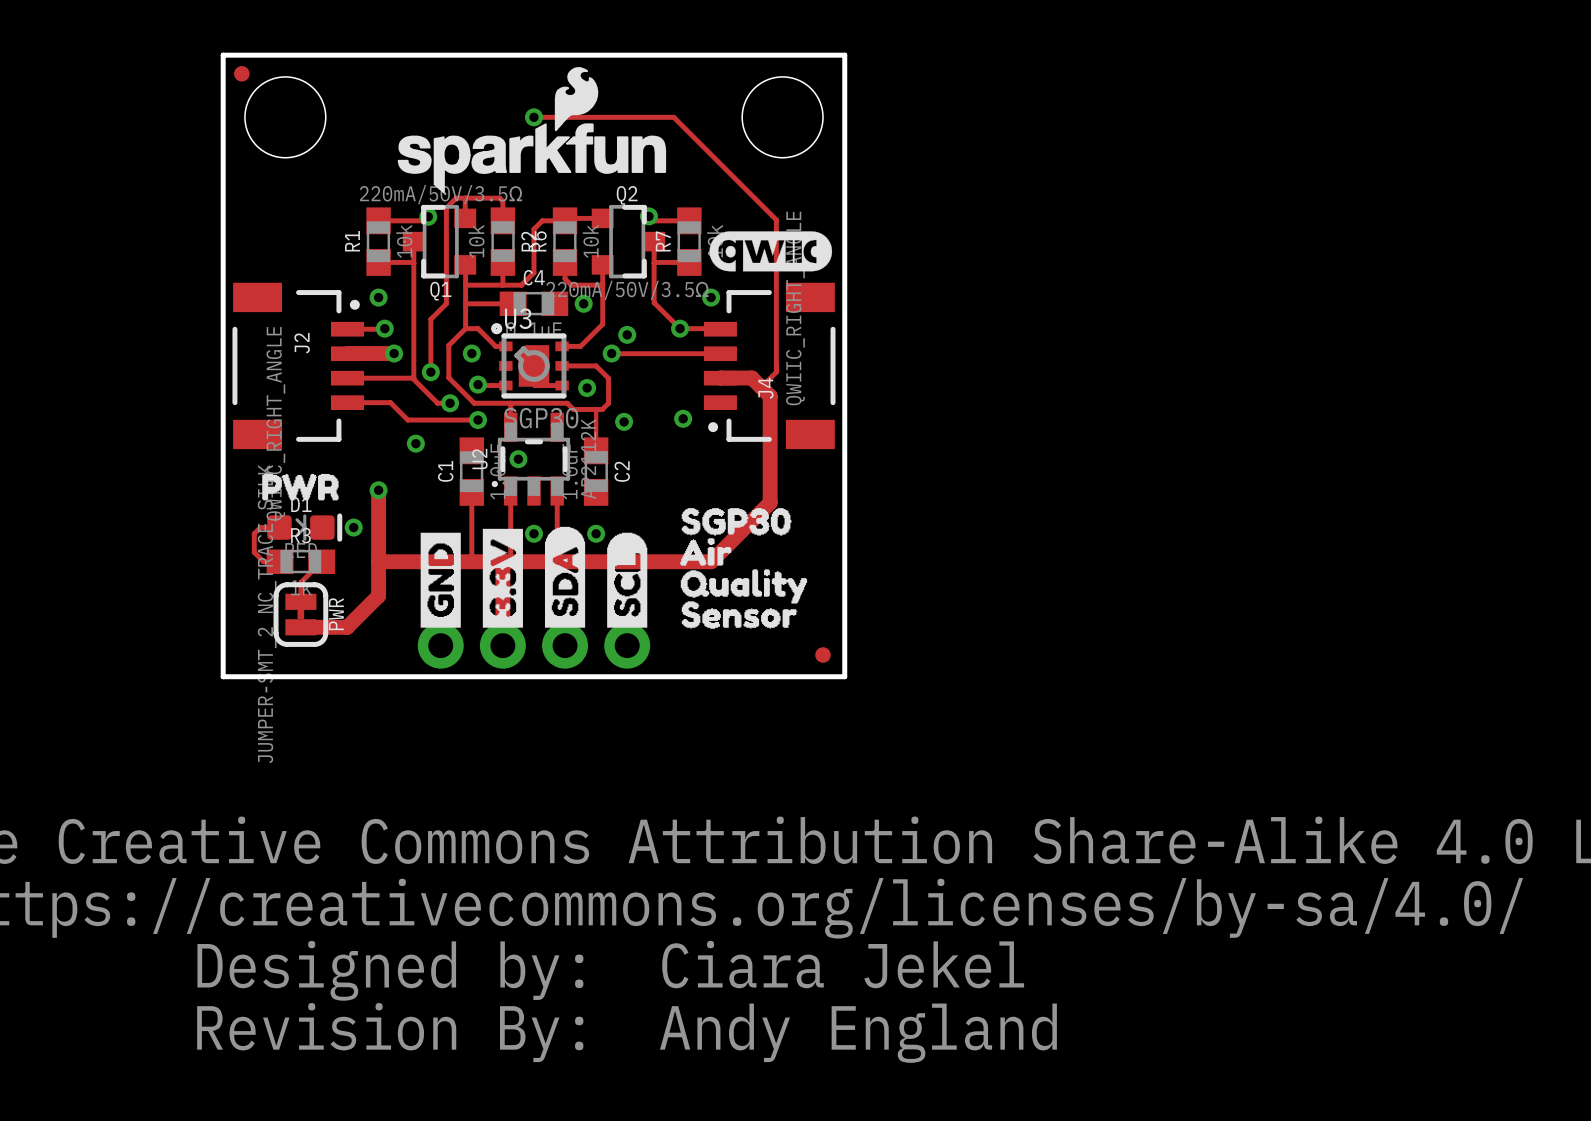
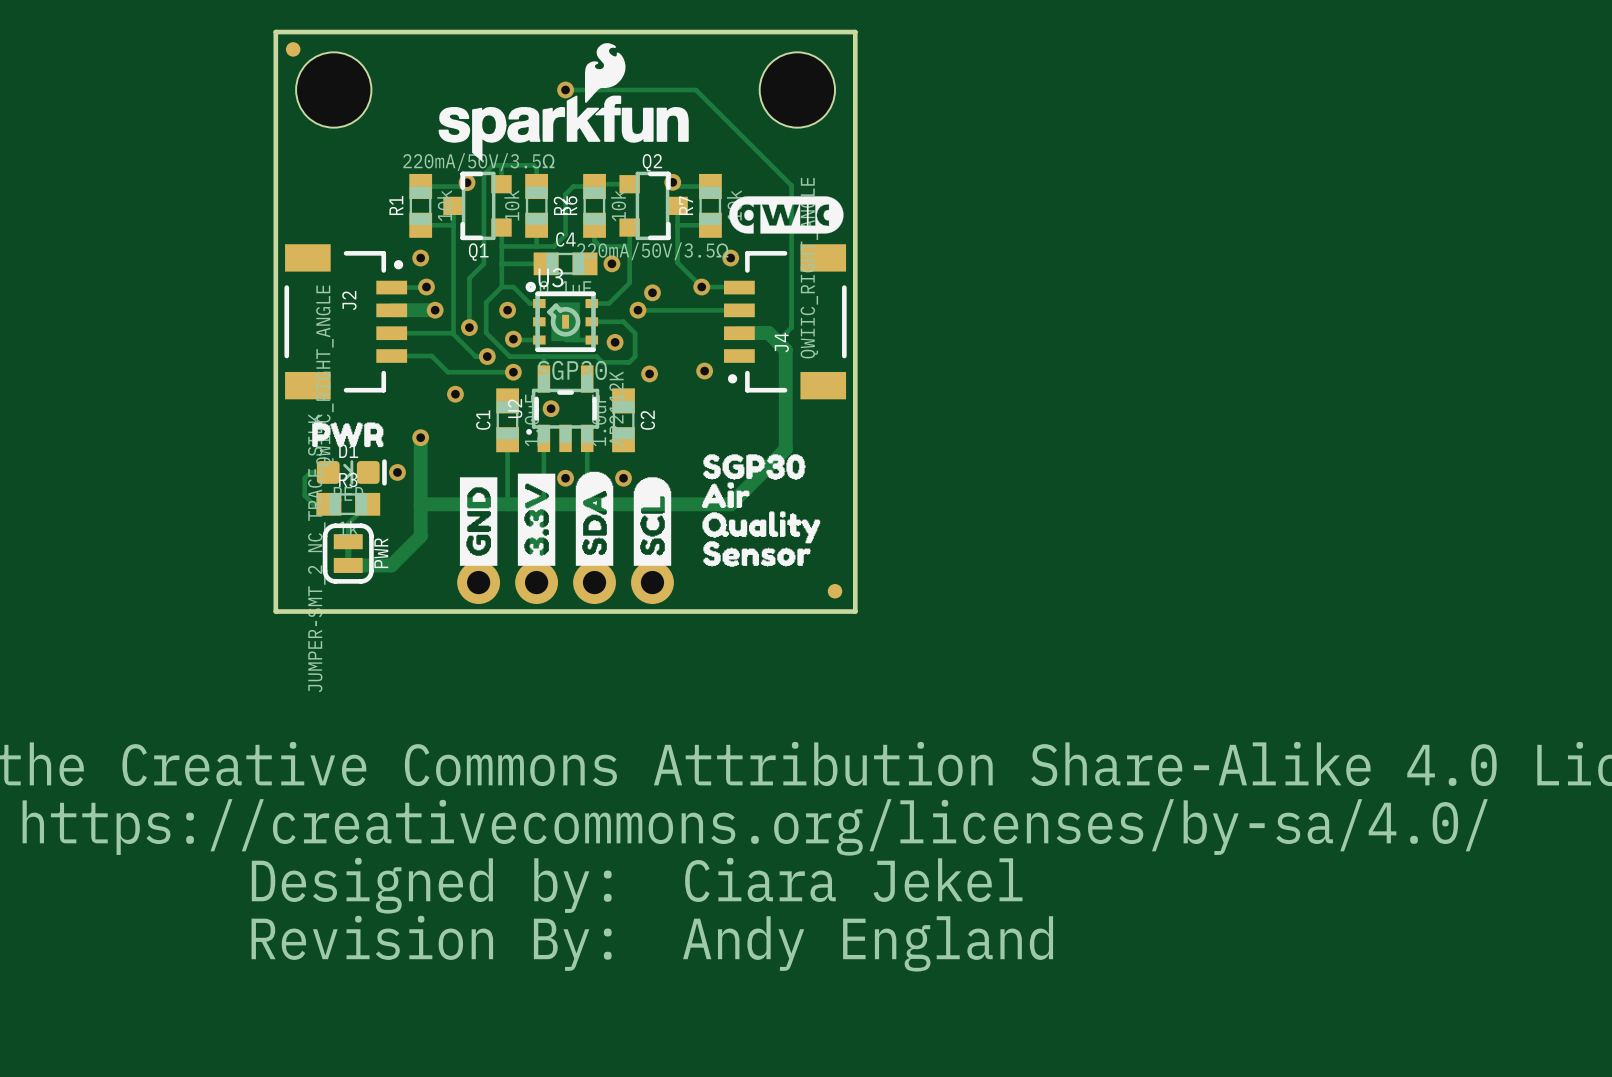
track: (596, 409) (596, 450) -> none

